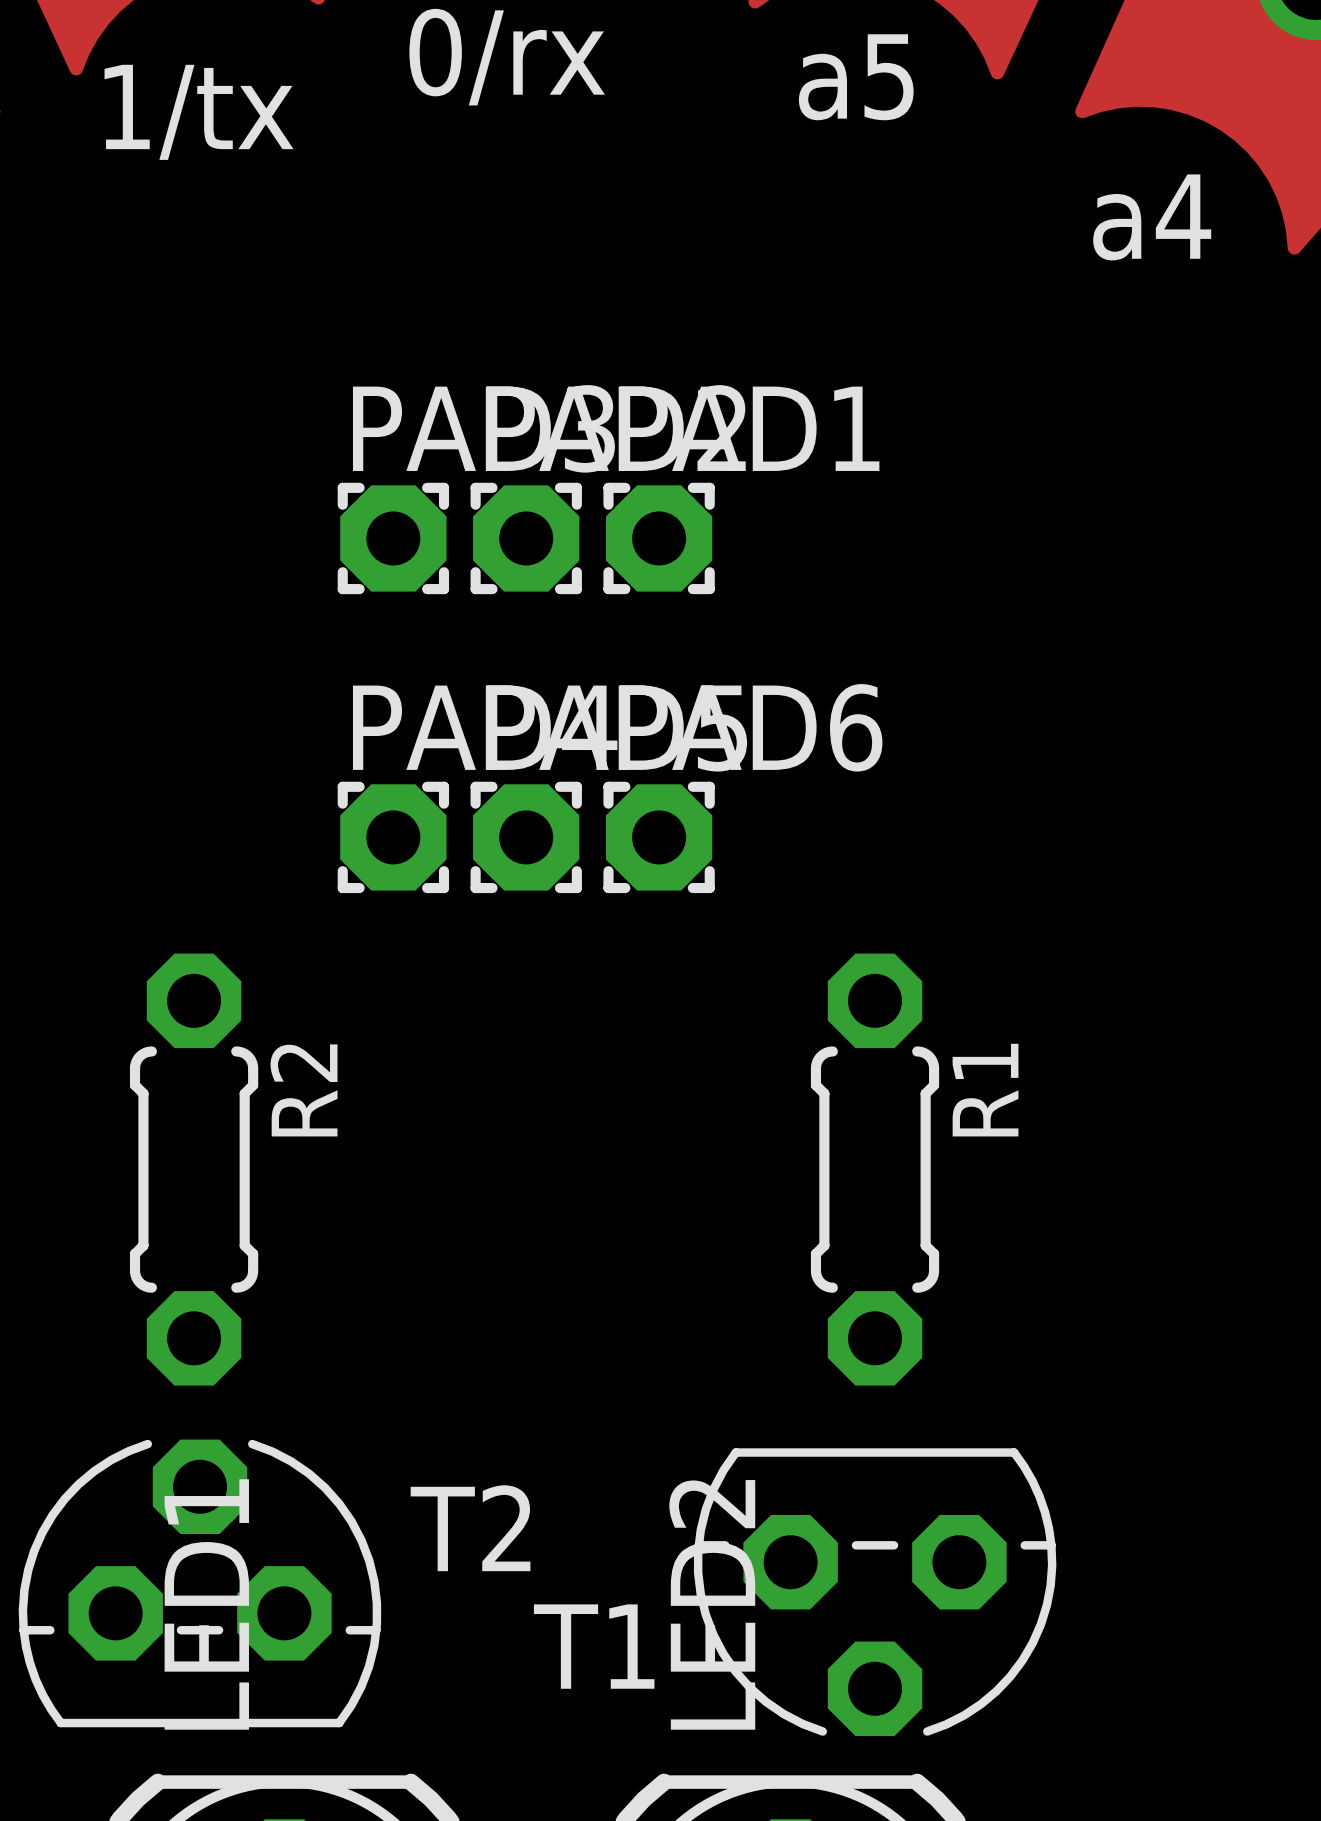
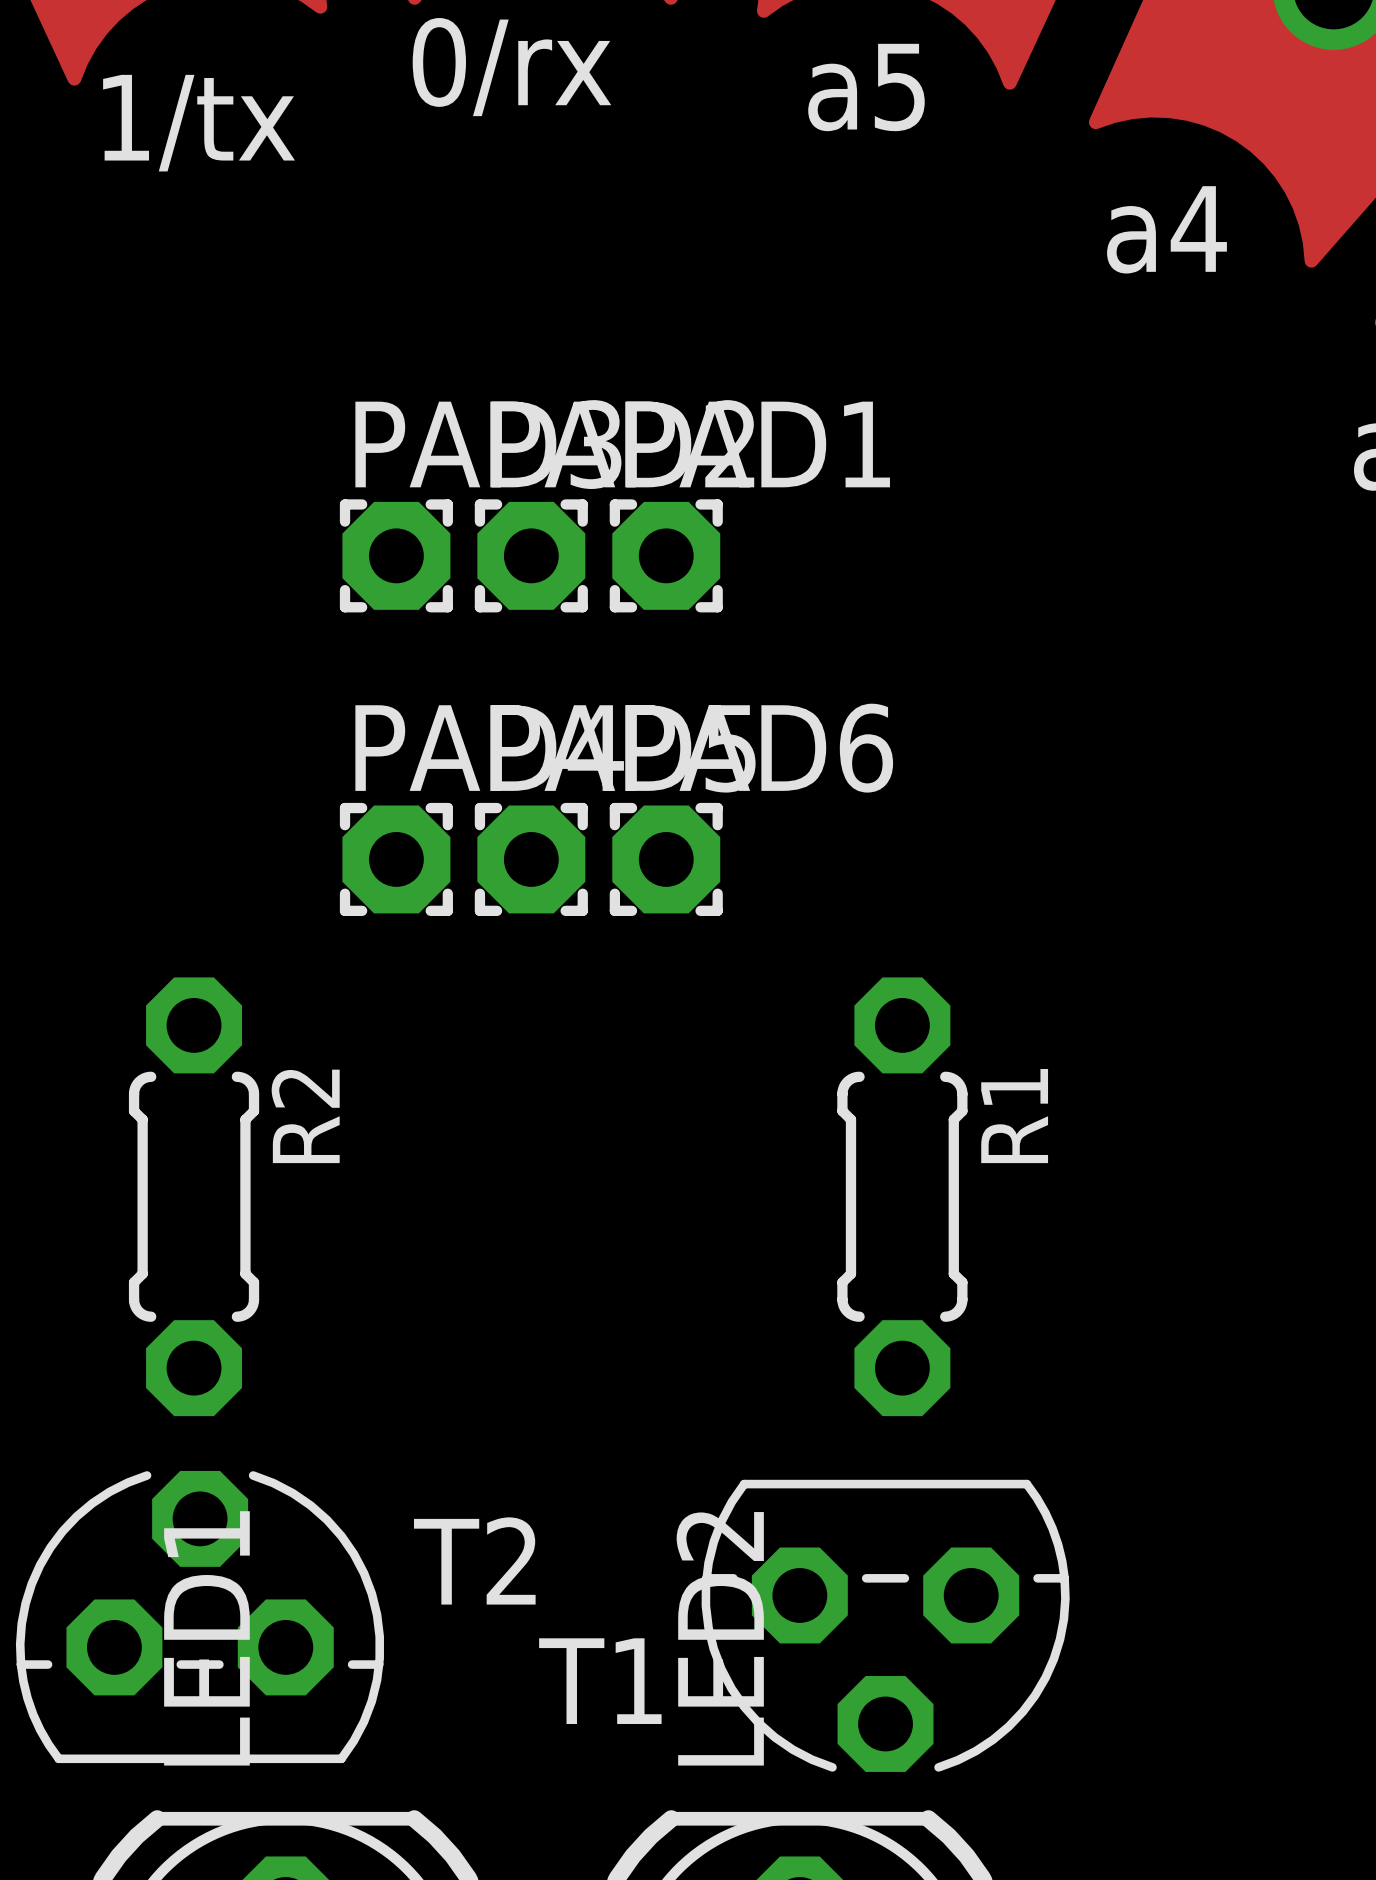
R1 position: (875, 1169) -> (902, 1196)

